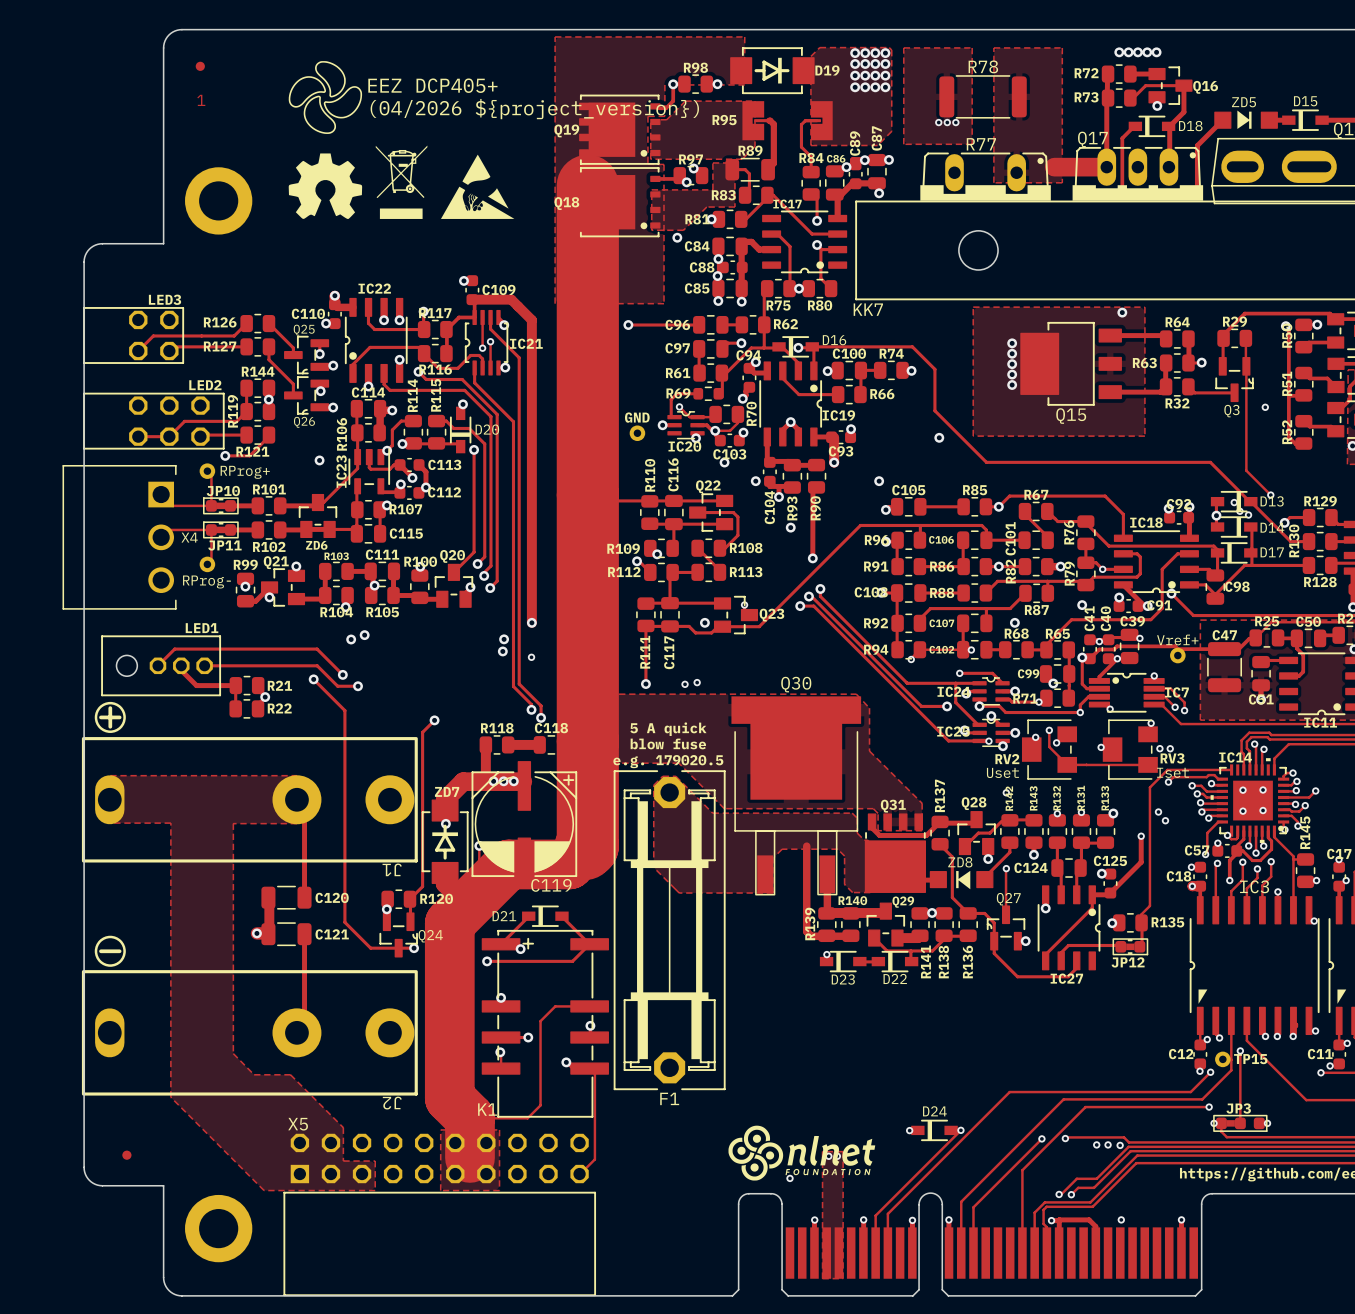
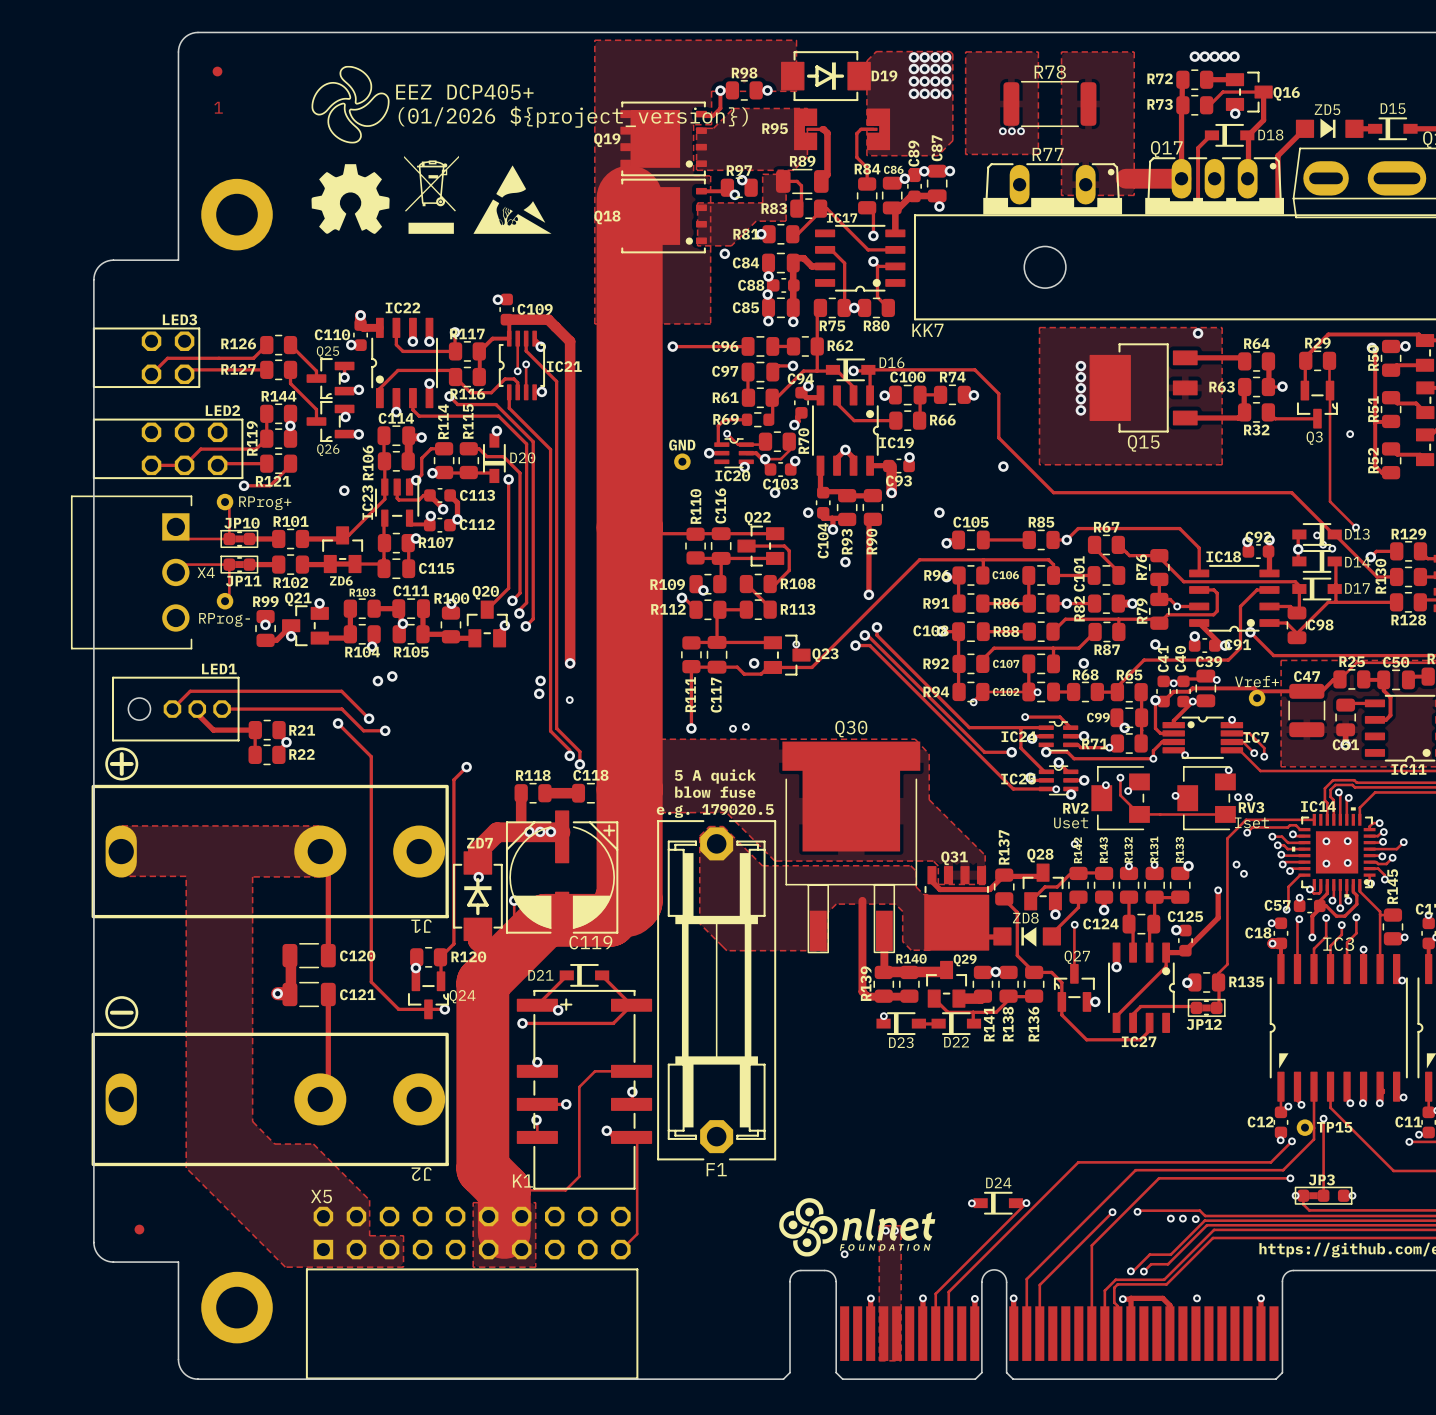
text: (04/2026 ${project_version}) (534, 109) -> (01/2026 ${project_version}) (573, 116)

